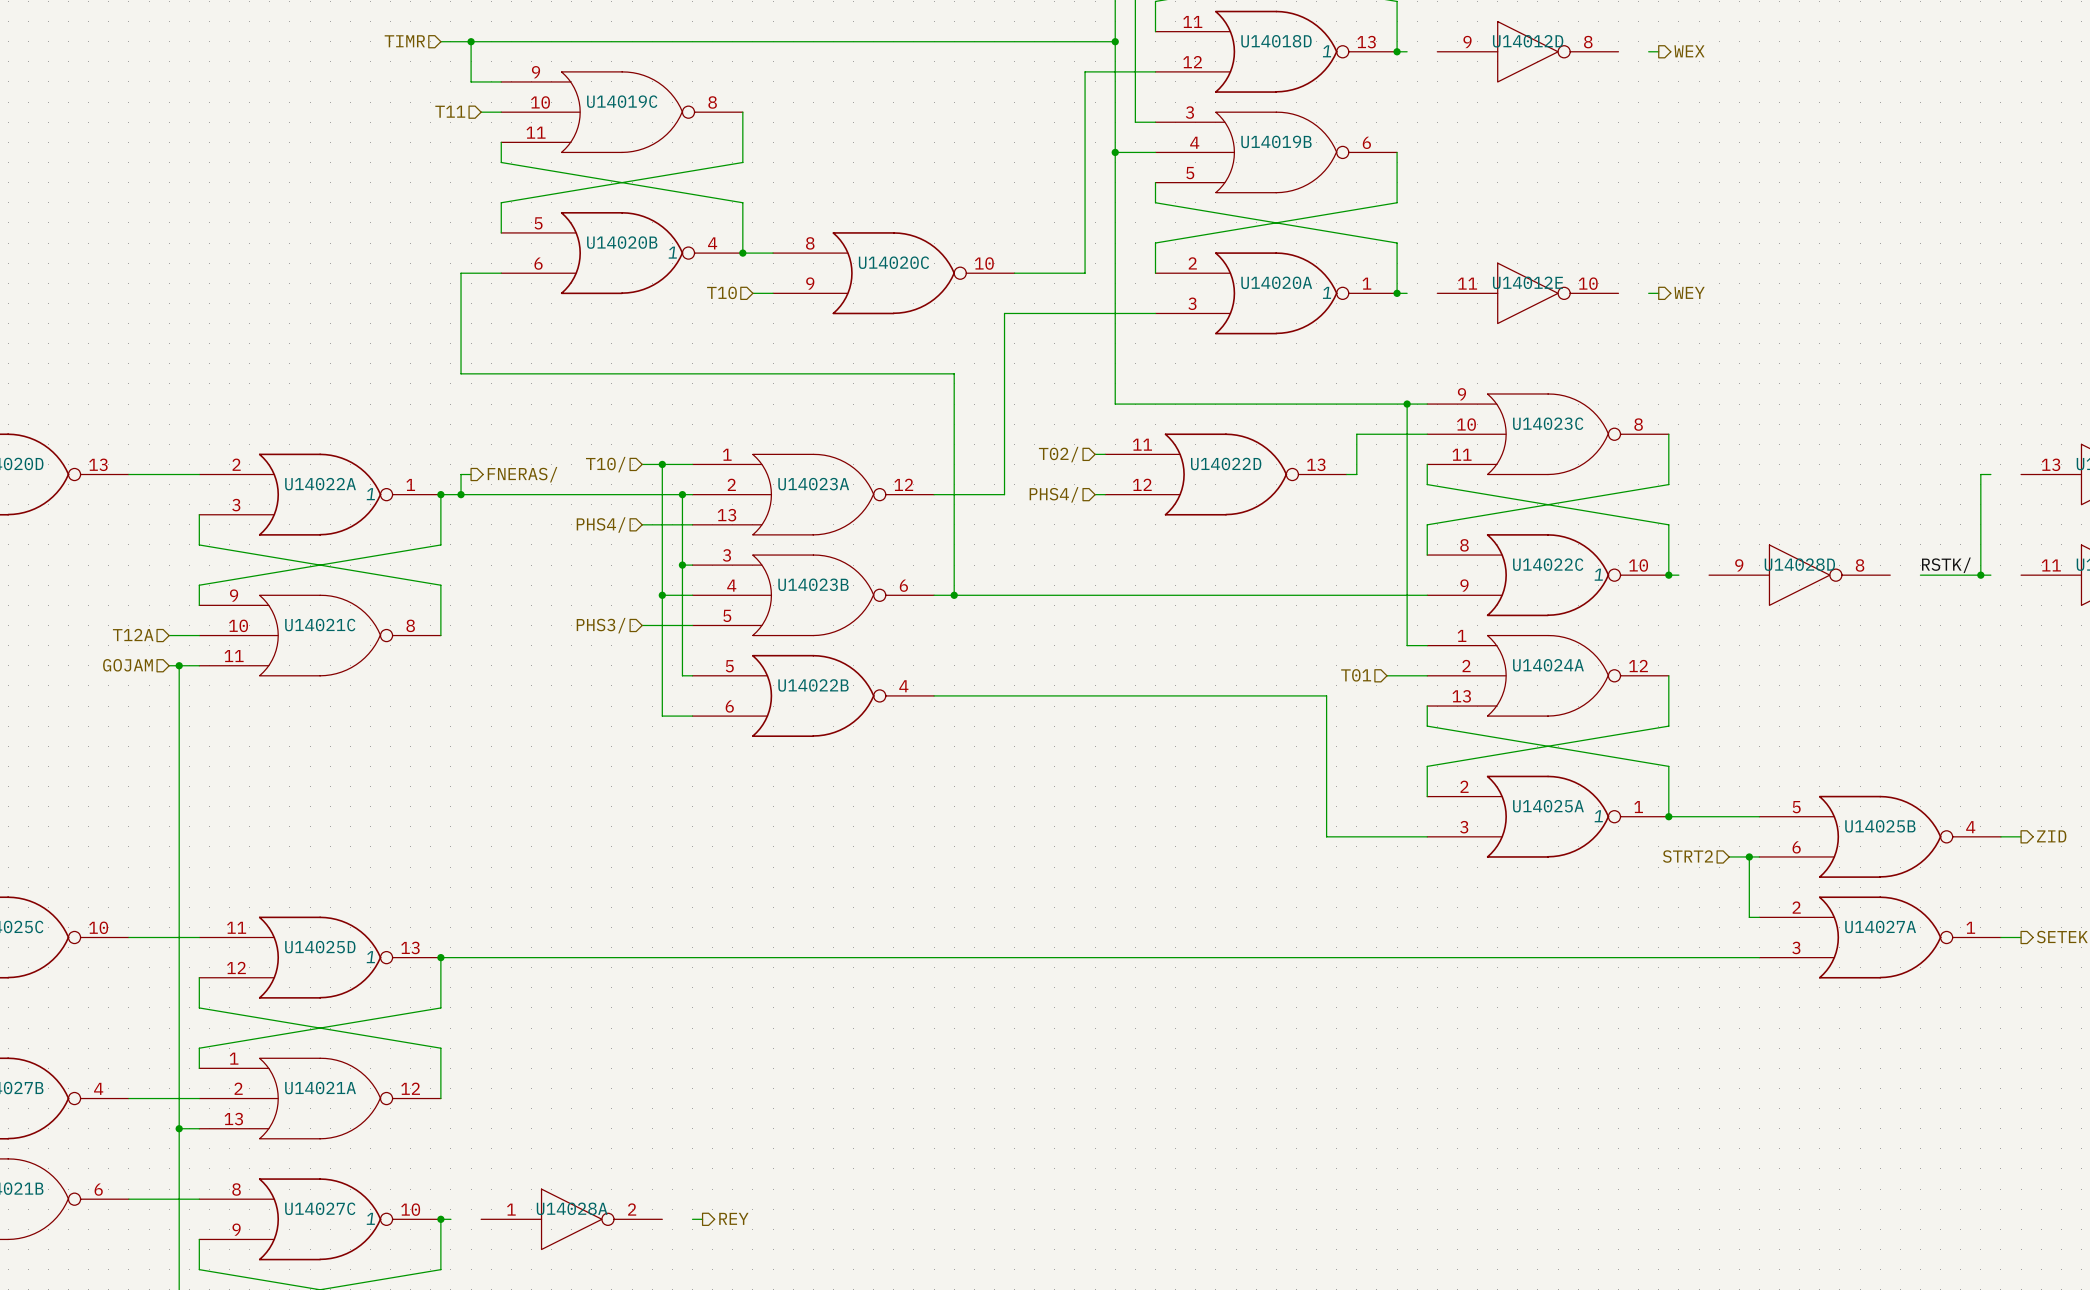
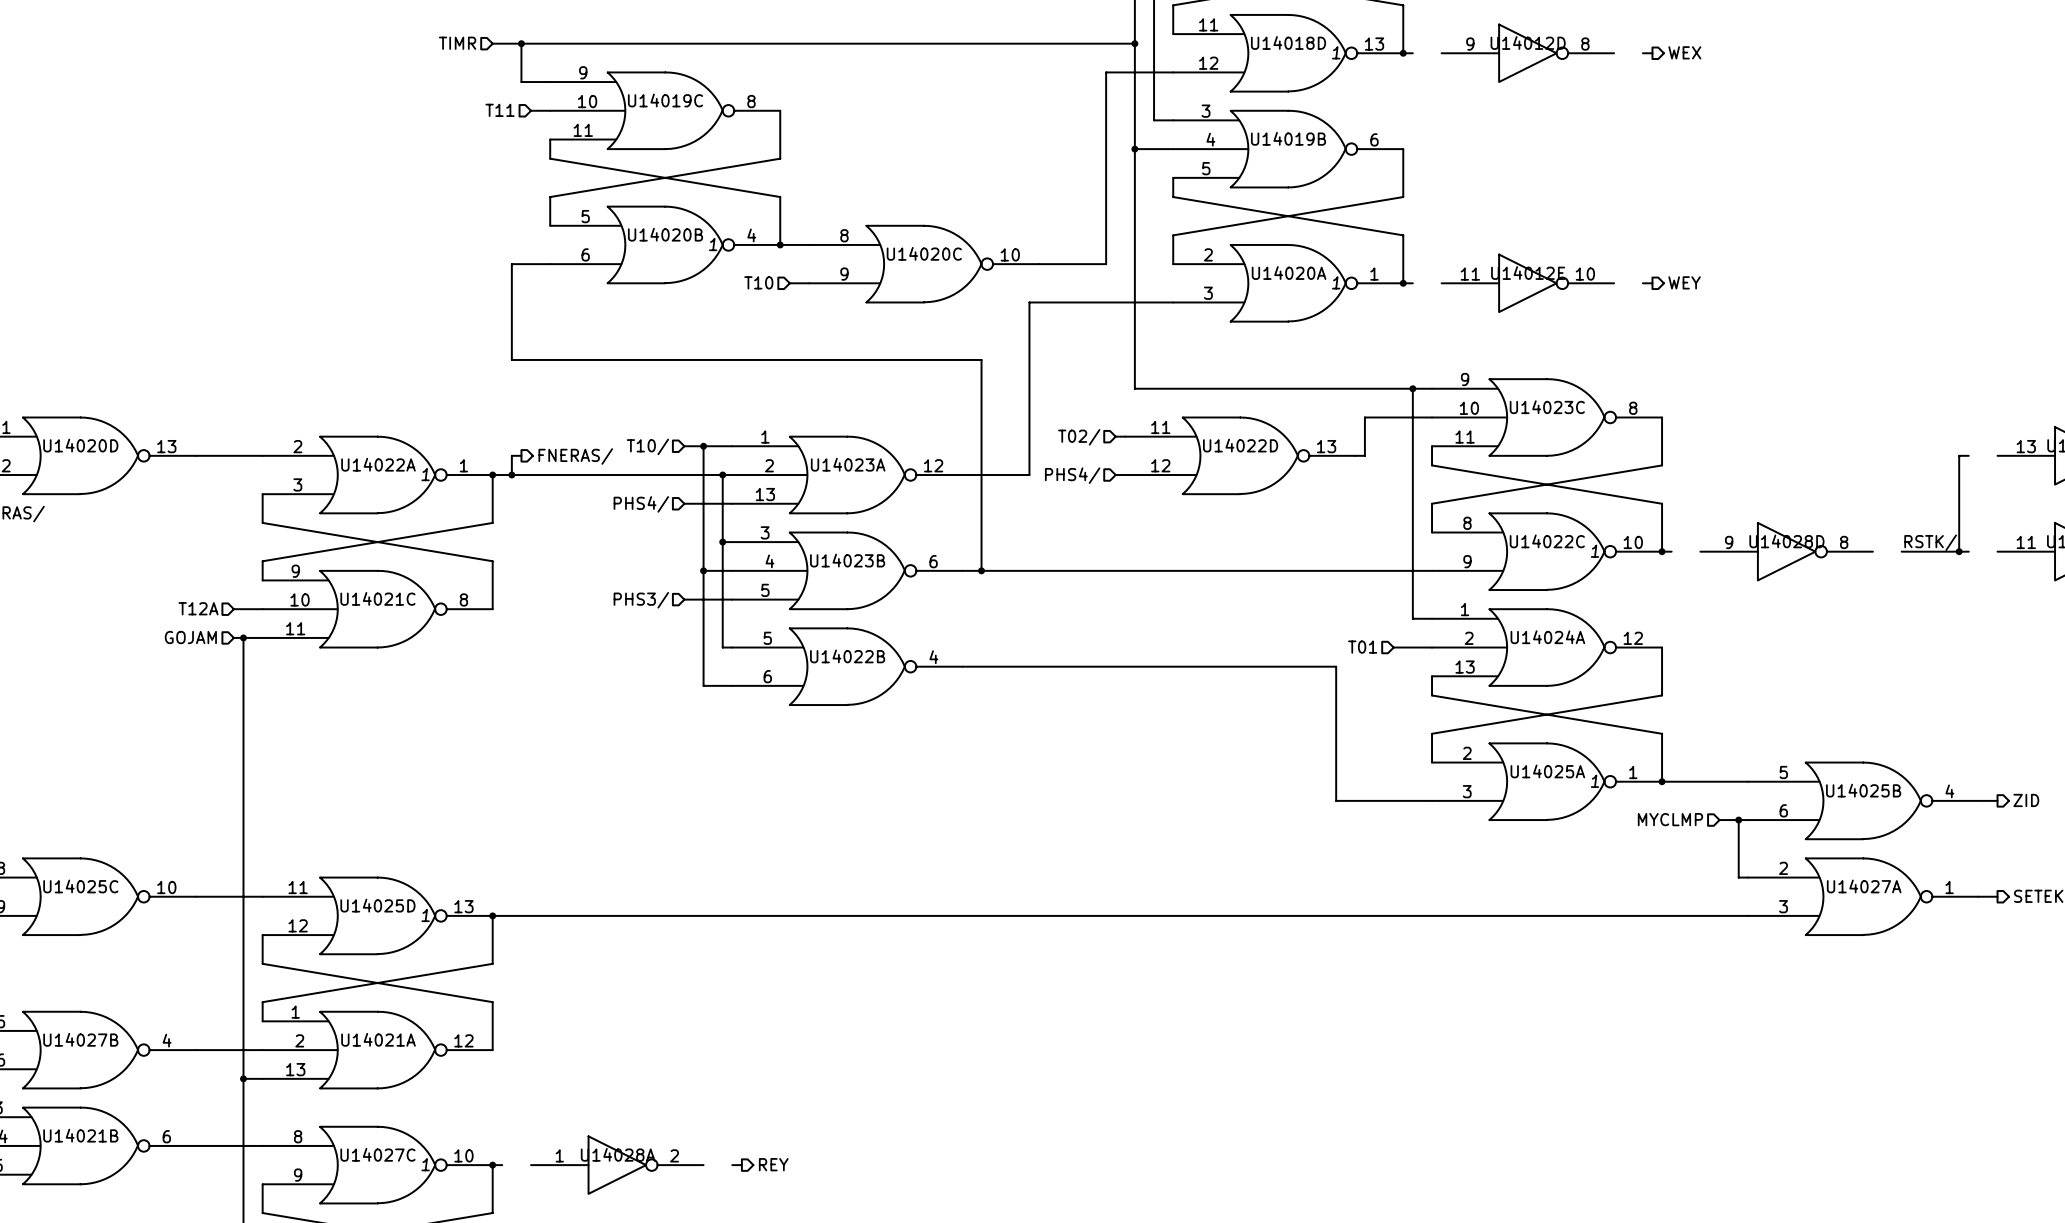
hierarchical label: STRT2 (1687, 856) -> MYCLMP (1670, 819)

